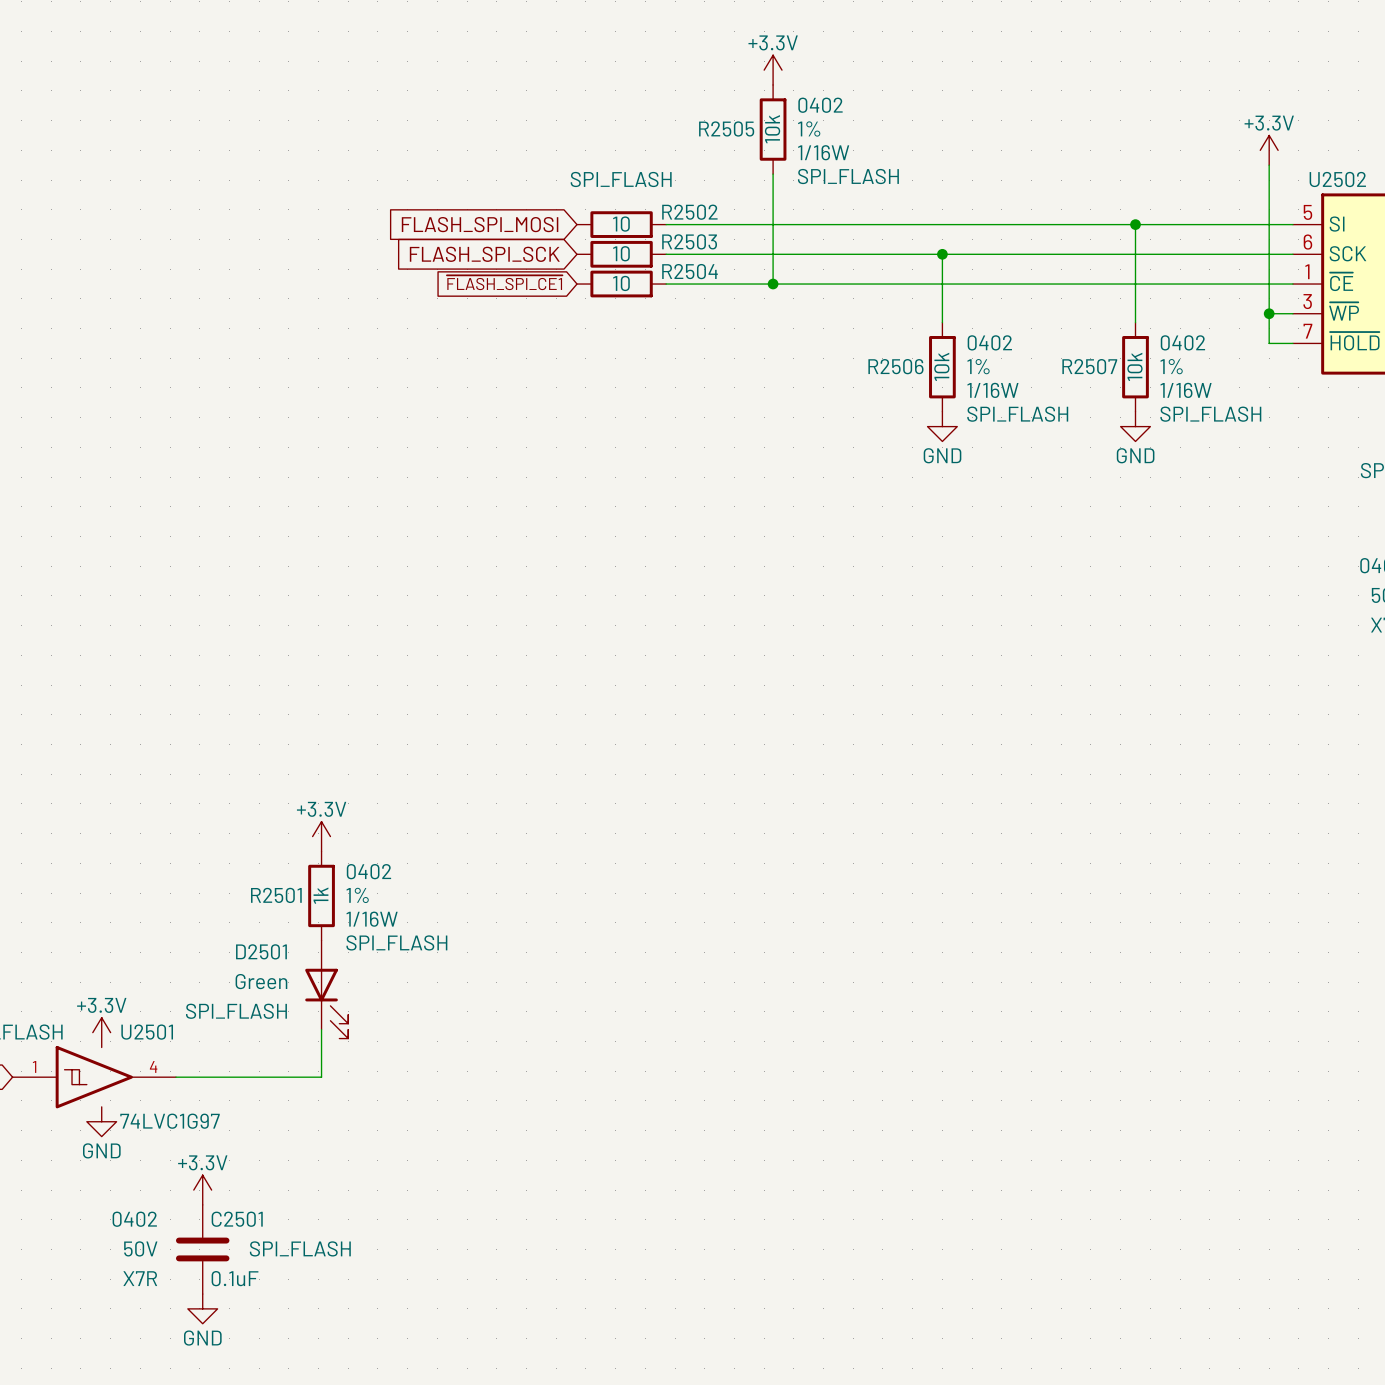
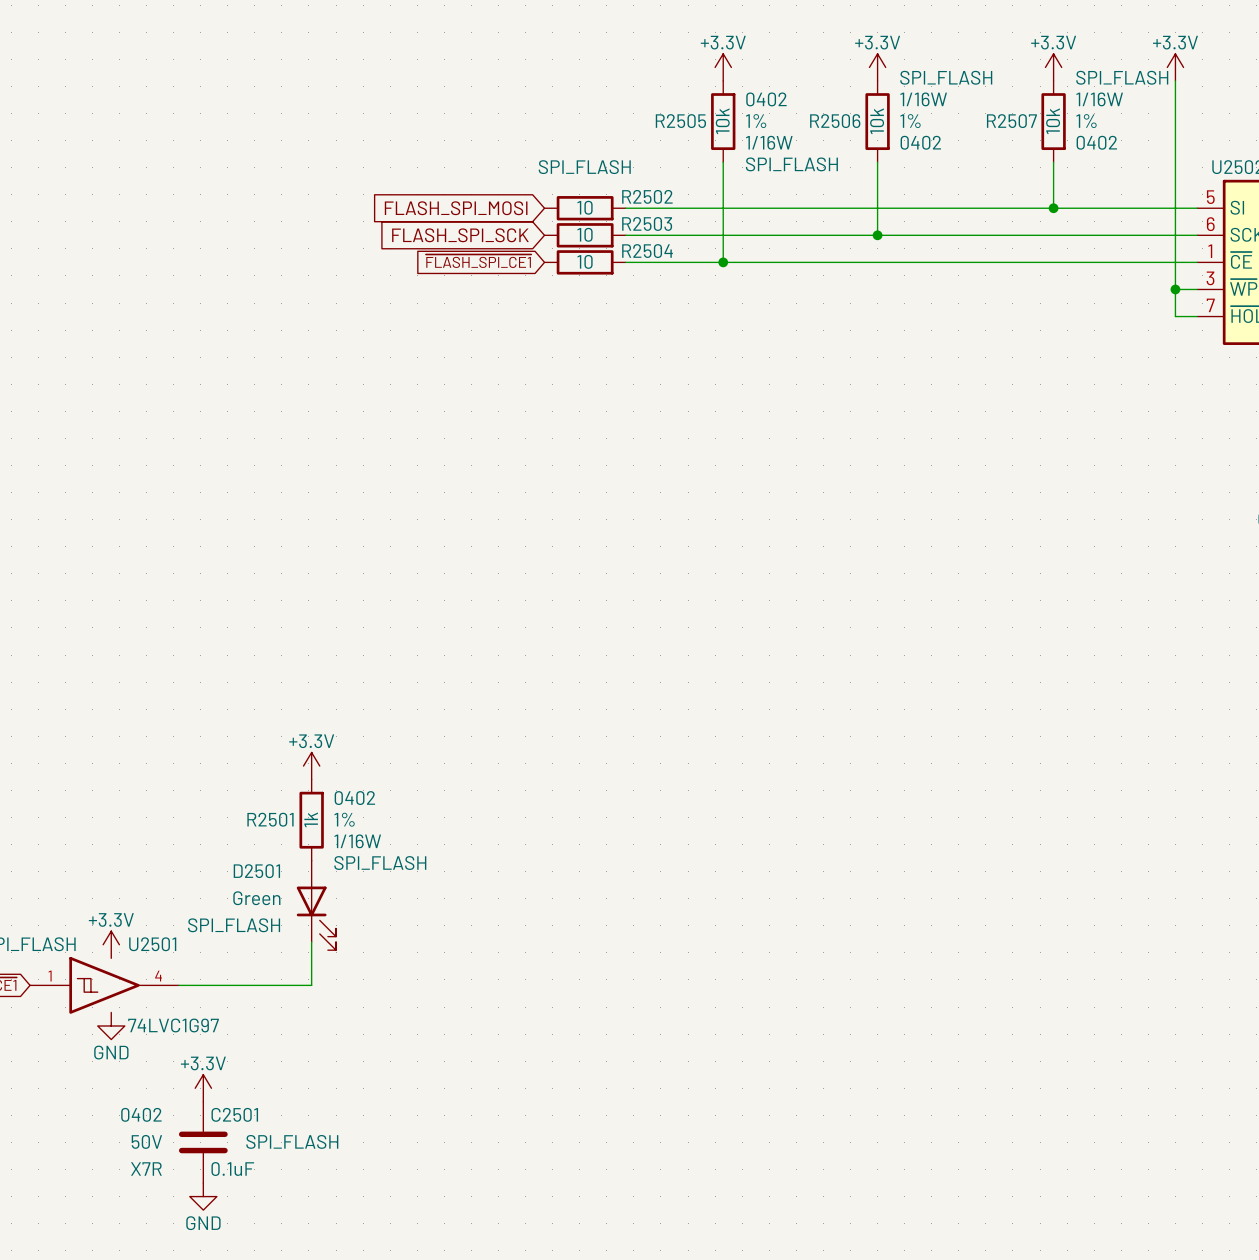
power symbol: none -> +3.3V (877, 67)
power symbol: none -> +3.3V (1053, 67)
power symbol: none -> +3.3V (1175, 67)
wire: none -> (1175, 80) (1175, 154)
power symbol: +3.3V (1269, 150) -> none
wire: (1135, 224) (1135, 322) -> (1053, 208) (1053, 162)
wire: (942, 254) (942, 322) -> (877, 235) (877, 162)
R2506 text position: 0402 (989, 342) -> 0402 (920, 142)
R2507 text position: 0402 (1182, 342) -> 0402 (1096, 142)
R2506 position: (942, 367) -> (877, 121)
R2507 position: (1135, 367) -> (1053, 121)
R2506 text position: 1/16W (992, 390) -> 1/16W (923, 99)
R2507 text position: 1/16W (1186, 390) -> 1/16W (1099, 99)
R2506 text position: SPI_FLASH (1017, 414) -> SPI_FLASH (946, 77)
R2507 text position: SPI_FLASH (1210, 414) -> SPI_FLASH (1122, 77)
power symbol: GND (942, 426) -> none
power symbol: GND (1135, 426) -> none

